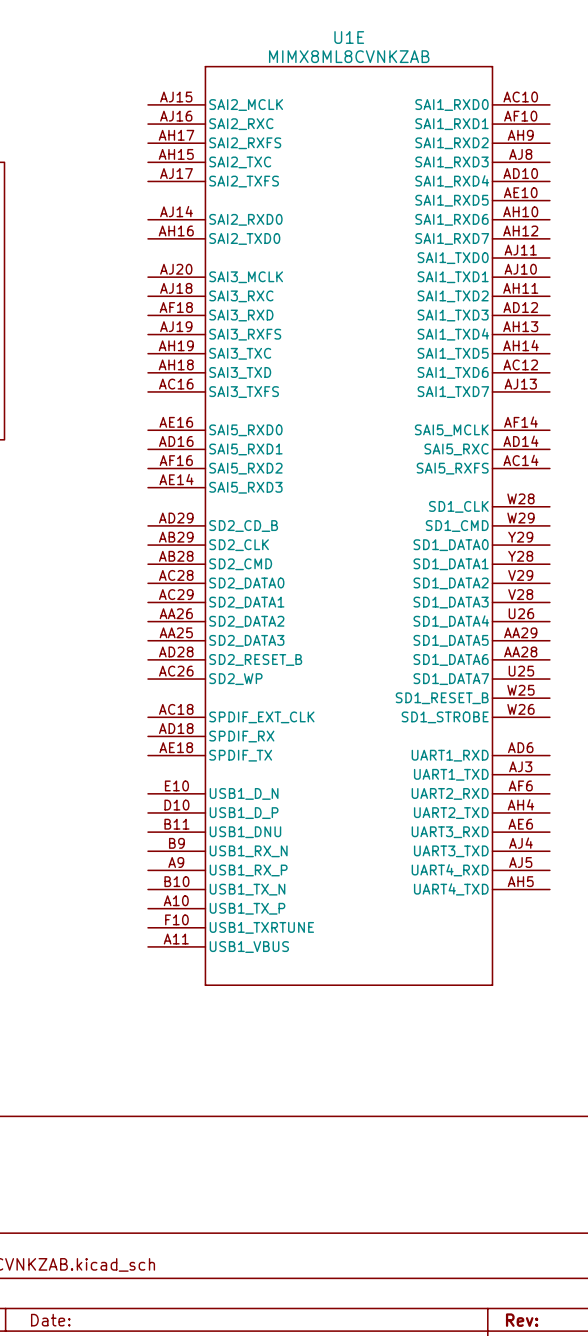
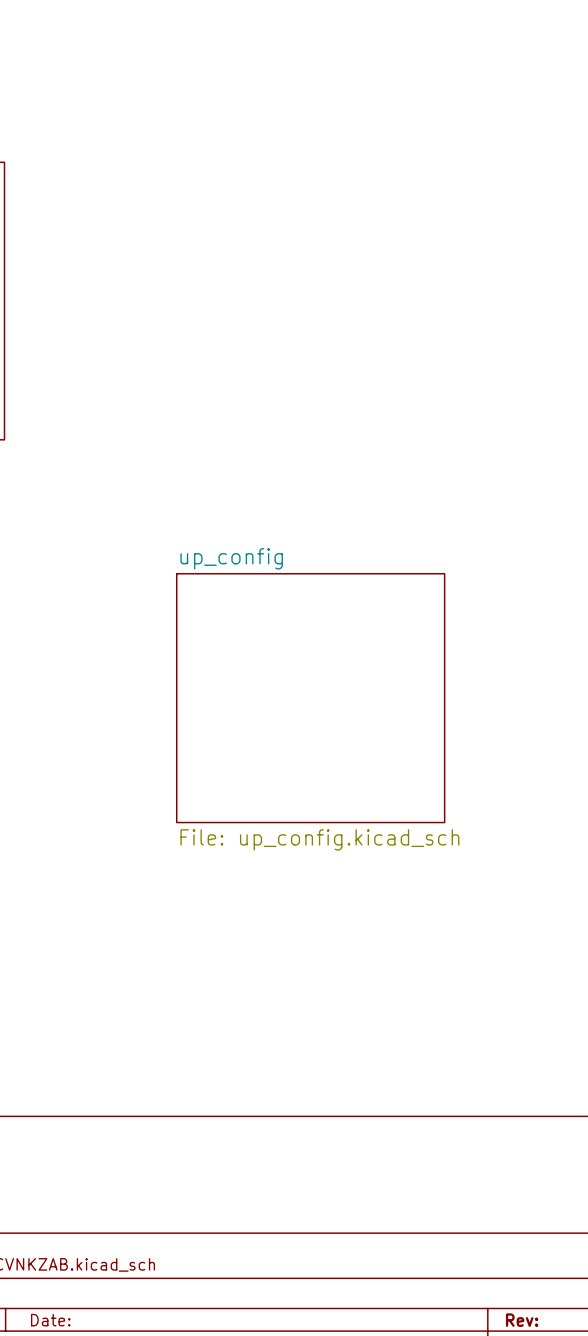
U1E: MIMX8ML8CVNKZAB (348, 525) -> none
sheet up_config: none -> File: up_config.kicad_sch (310, 698)

